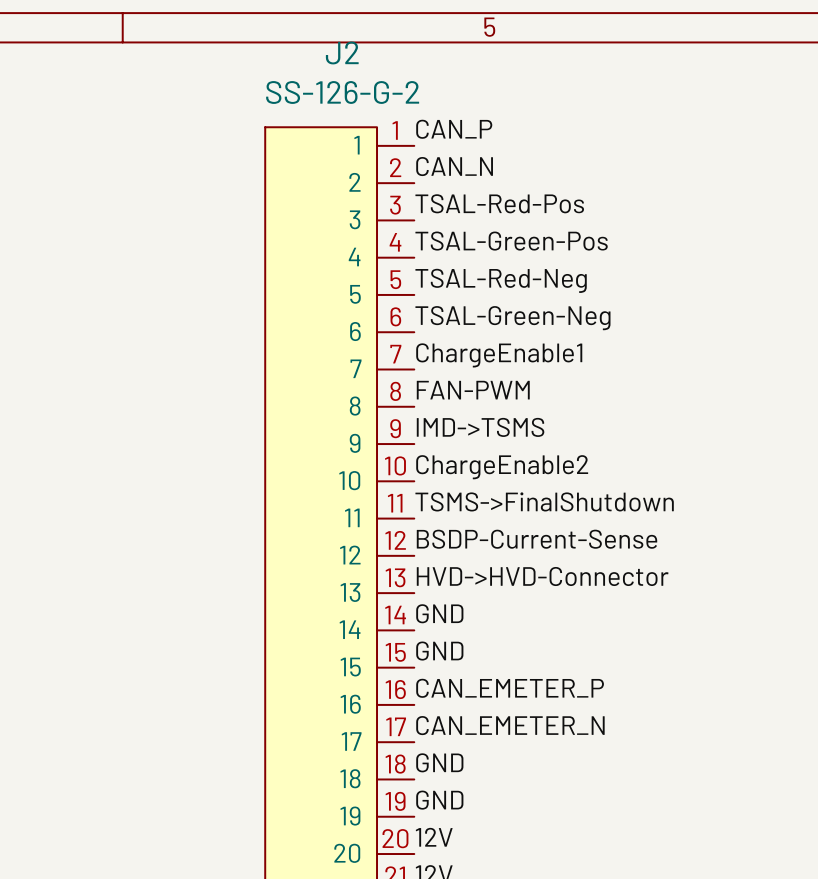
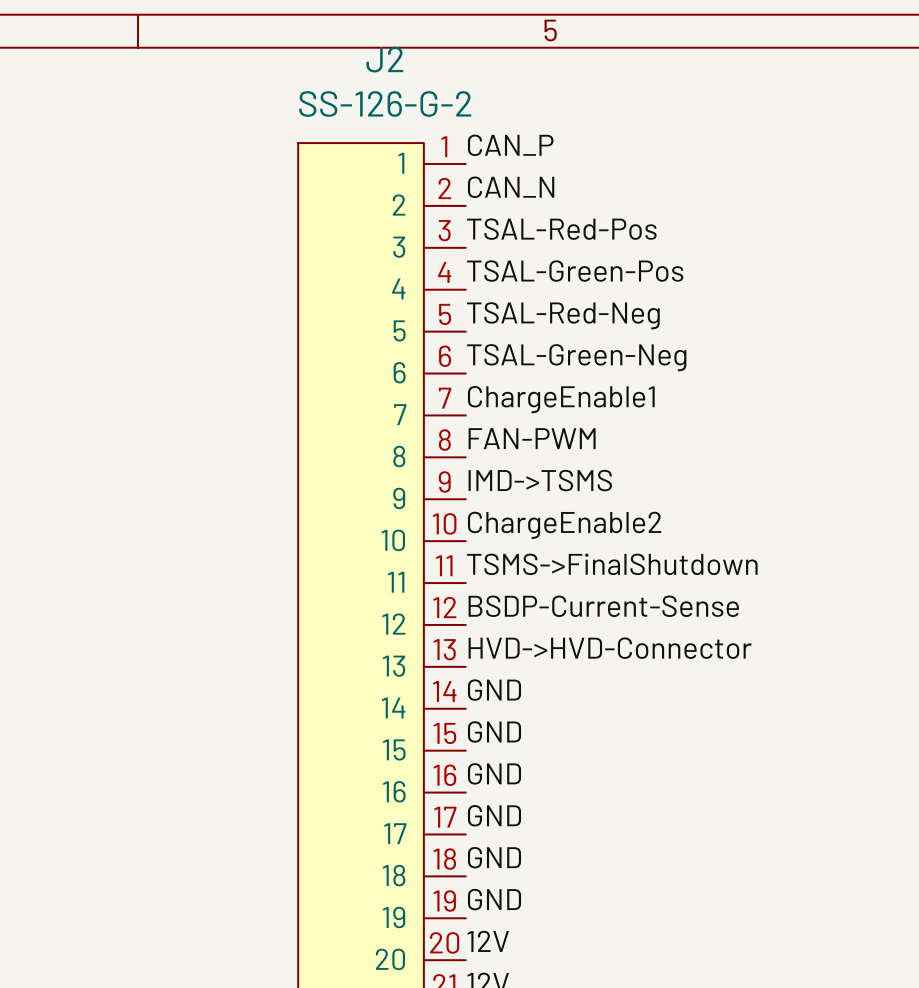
label: CAN_EMETER_P (510, 688) -> GND (494, 773)
label: CAN_EMETER_N (510, 725) -> GND (494, 815)

